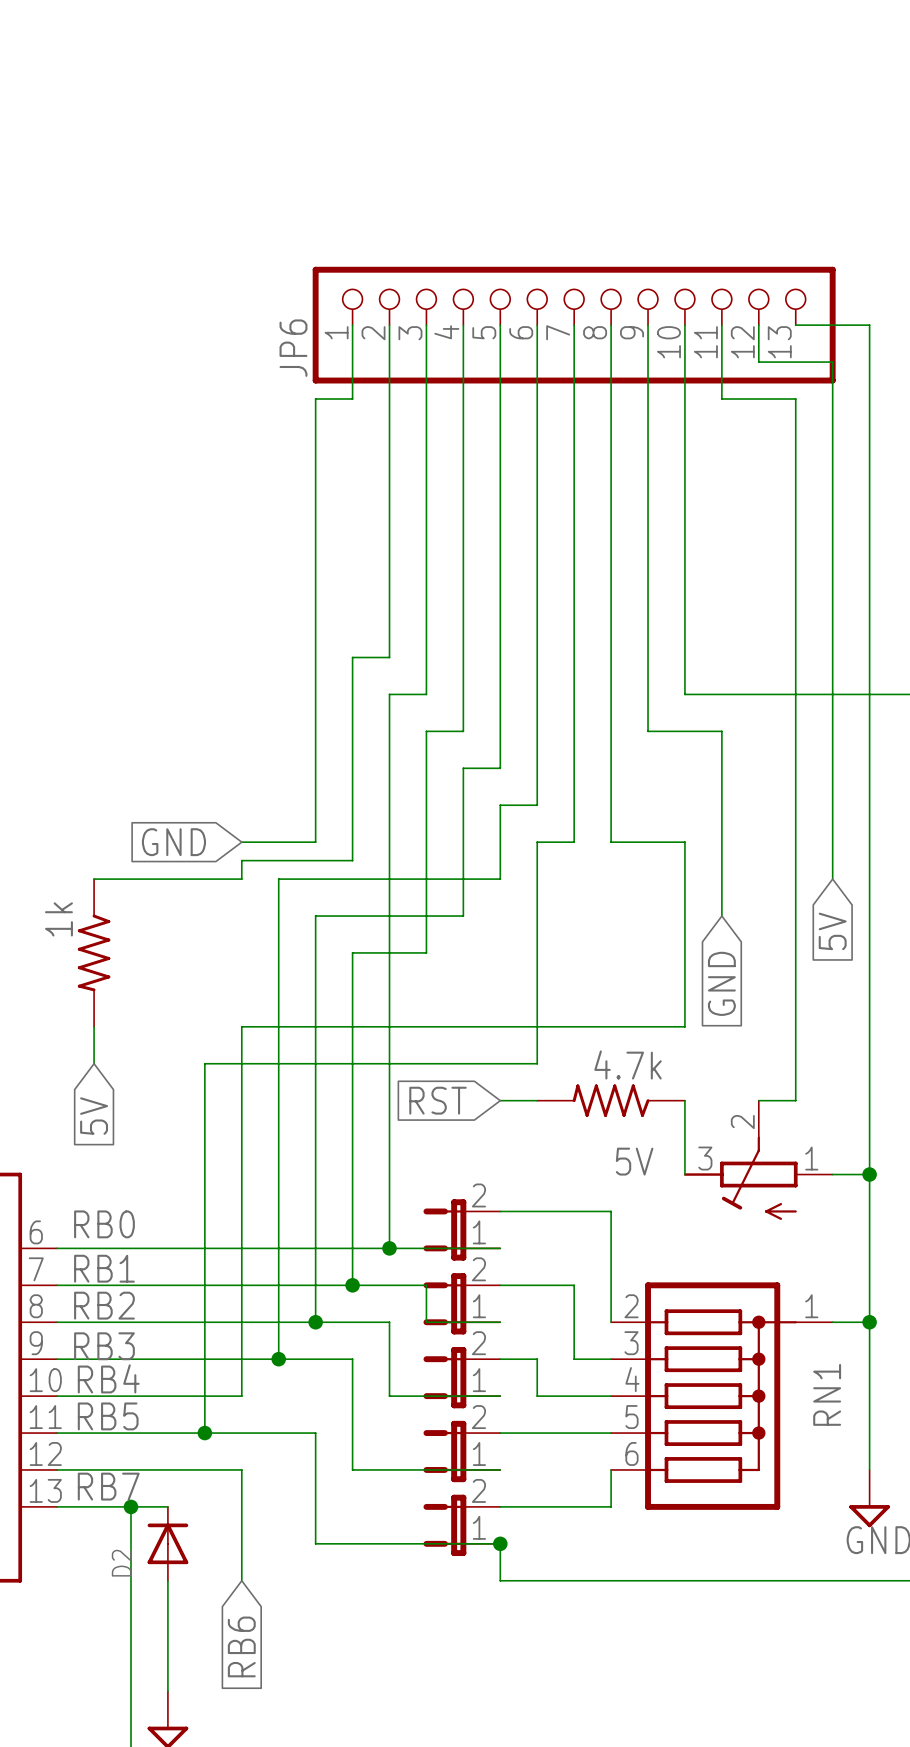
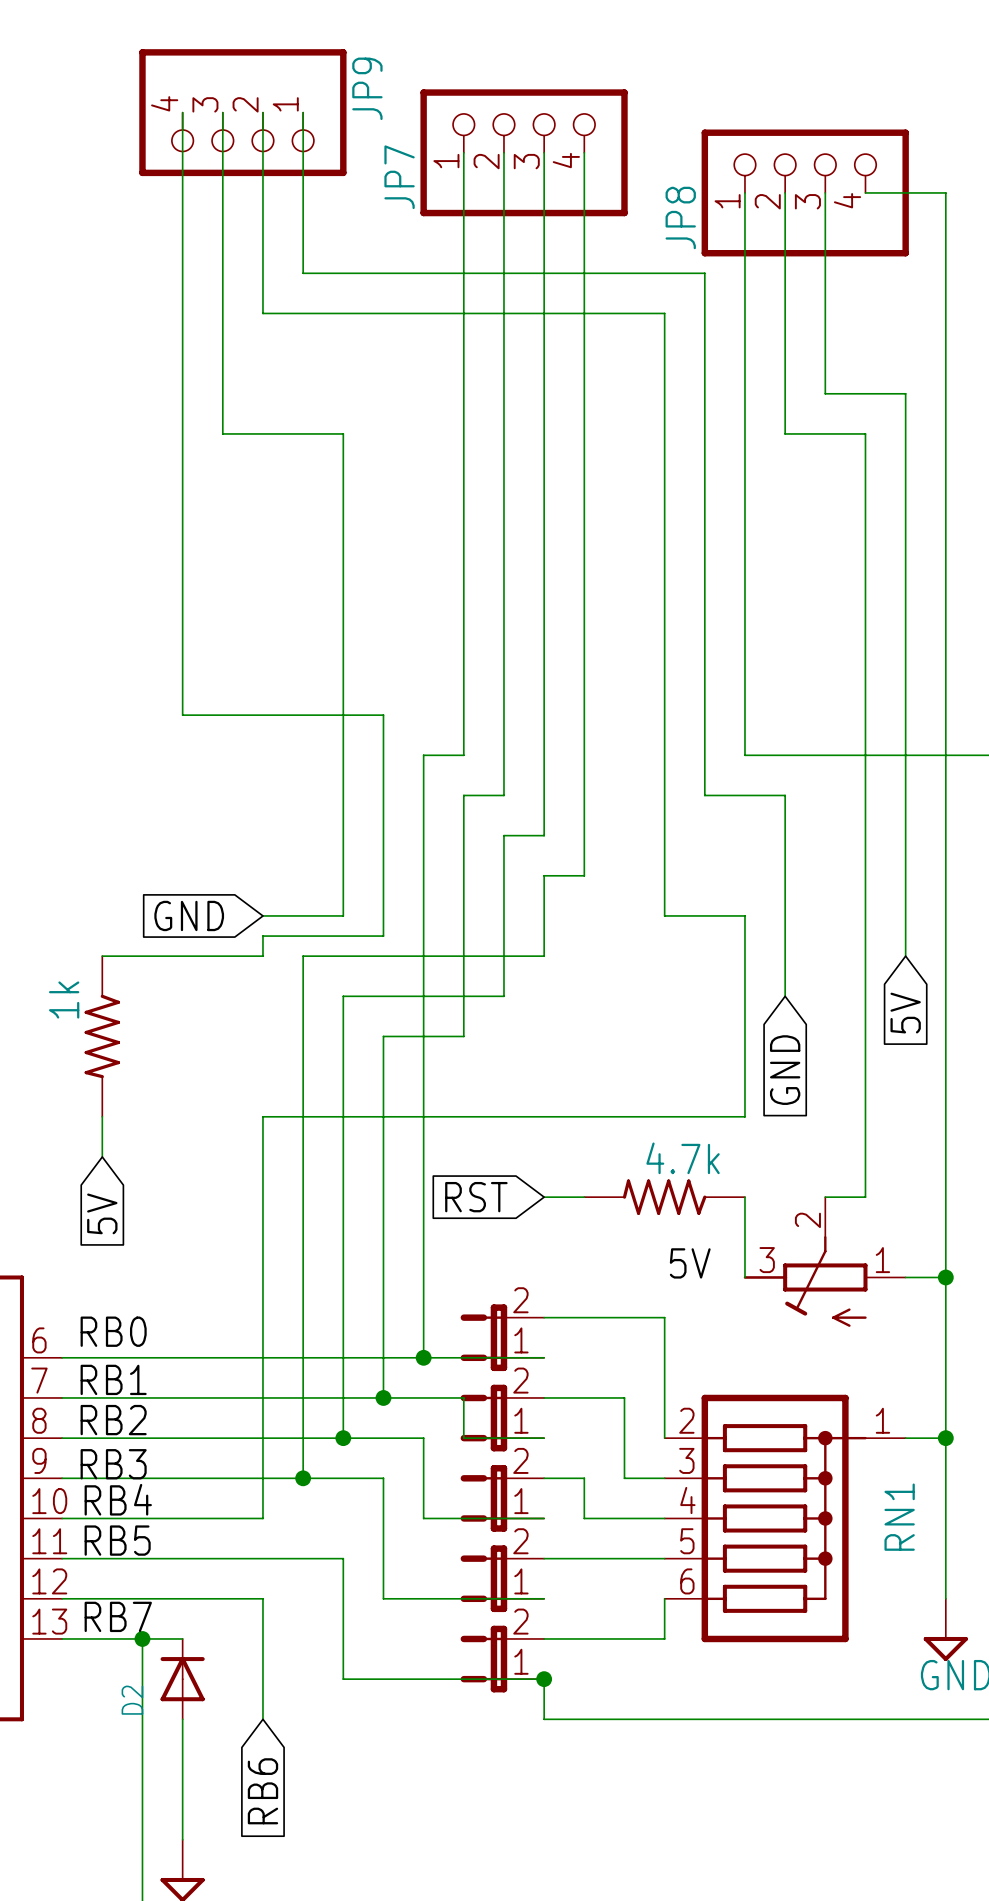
JP9: none -> (242, 112)
wire: none -> (262, 112) (262, 313) (664, 313) (664, 353)
wire: none -> (303, 112) (303, 273) (704, 273) (704, 353)
wire: none -> (463, 152) (463, 353)
wire: none -> (503, 152) (503, 353)
JP7: none -> (524, 152)
wire: none -> (544, 152) (544, 353)
wire: none -> (584, 152) (584, 353)
wire: none -> (744, 192) (744, 353)
wire: none -> (785, 192) (785, 353)
JP8: none -> (805, 192)
wire: none -> (825, 192) (825, 353)
wire: (352, 325) (352, 398) (315, 398) -> (222, 112) (222, 433) (343, 433)
wire: (389, 325) (389, 657) (352, 657) -> (182, 112) (182, 715) (383, 715)
wire: (574, 325) (574, 842) (537, 842) (537, 1063) (204, 1063) (204, 1433) -> none
JP6: (574, 325) -> none
wire: (795, 325) (869, 325) -> (865, 192) (945, 192) (945, 353)
junction: (204, 1433) -> none

